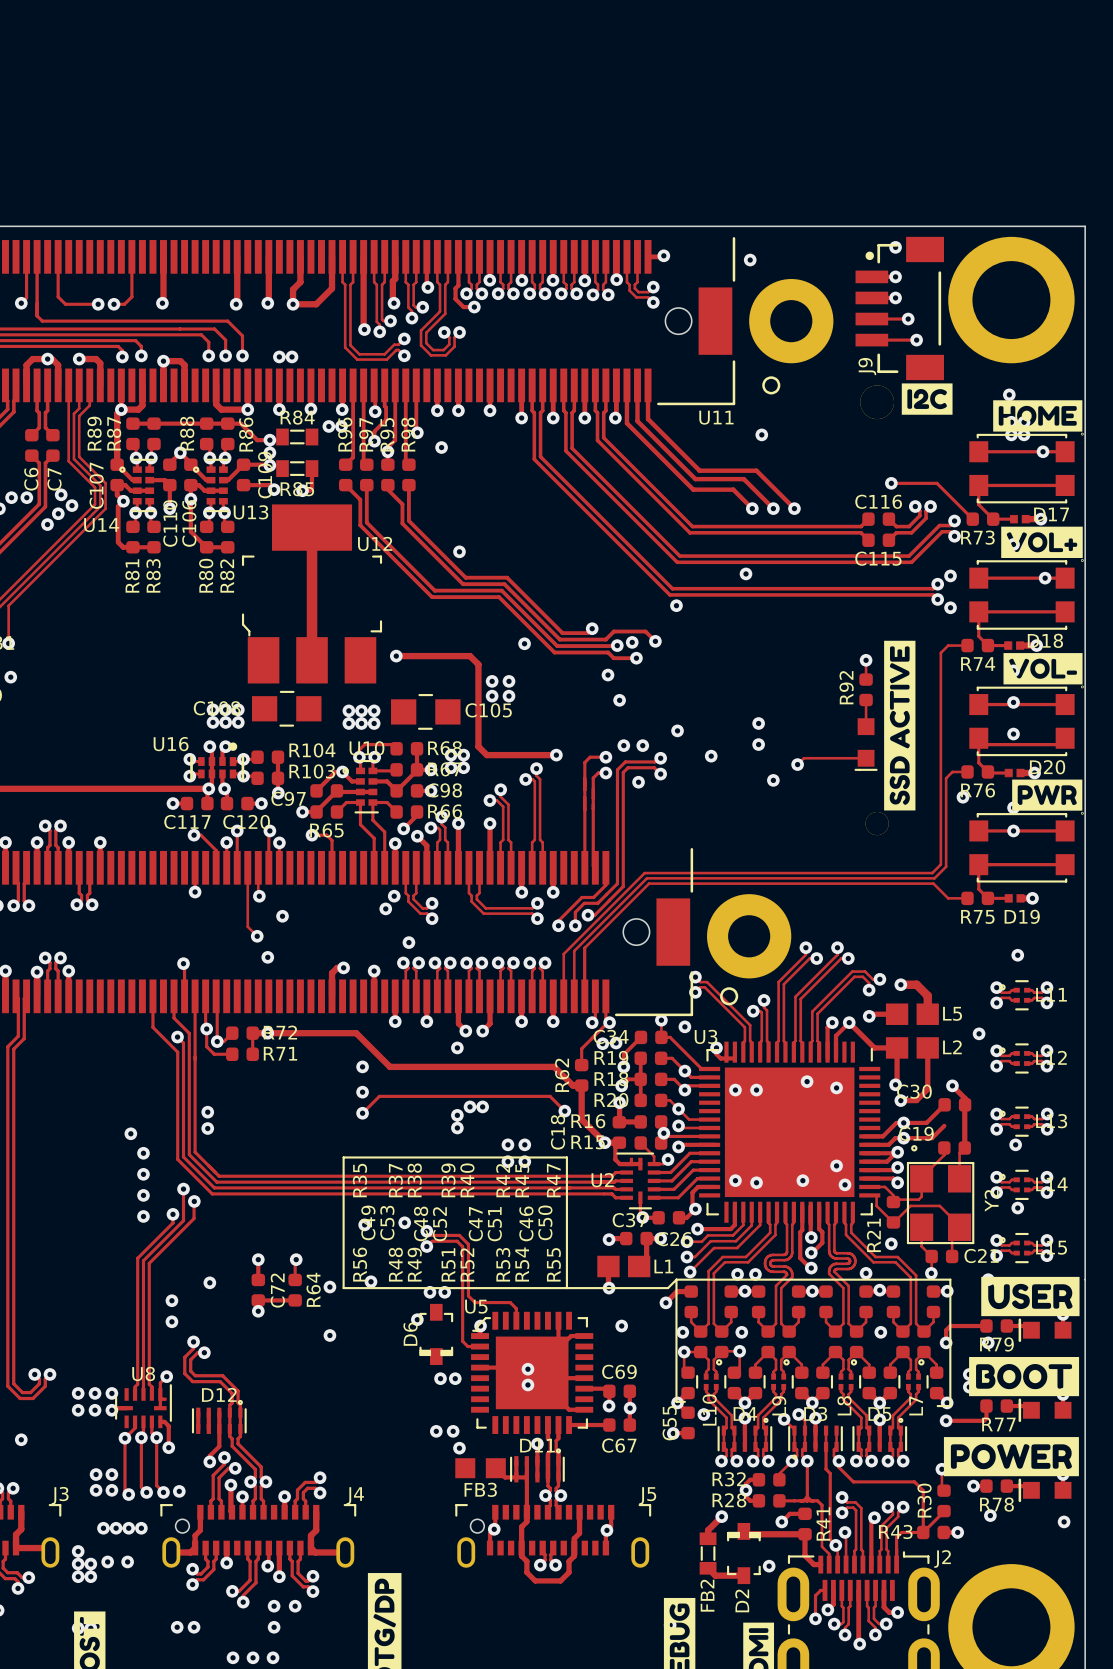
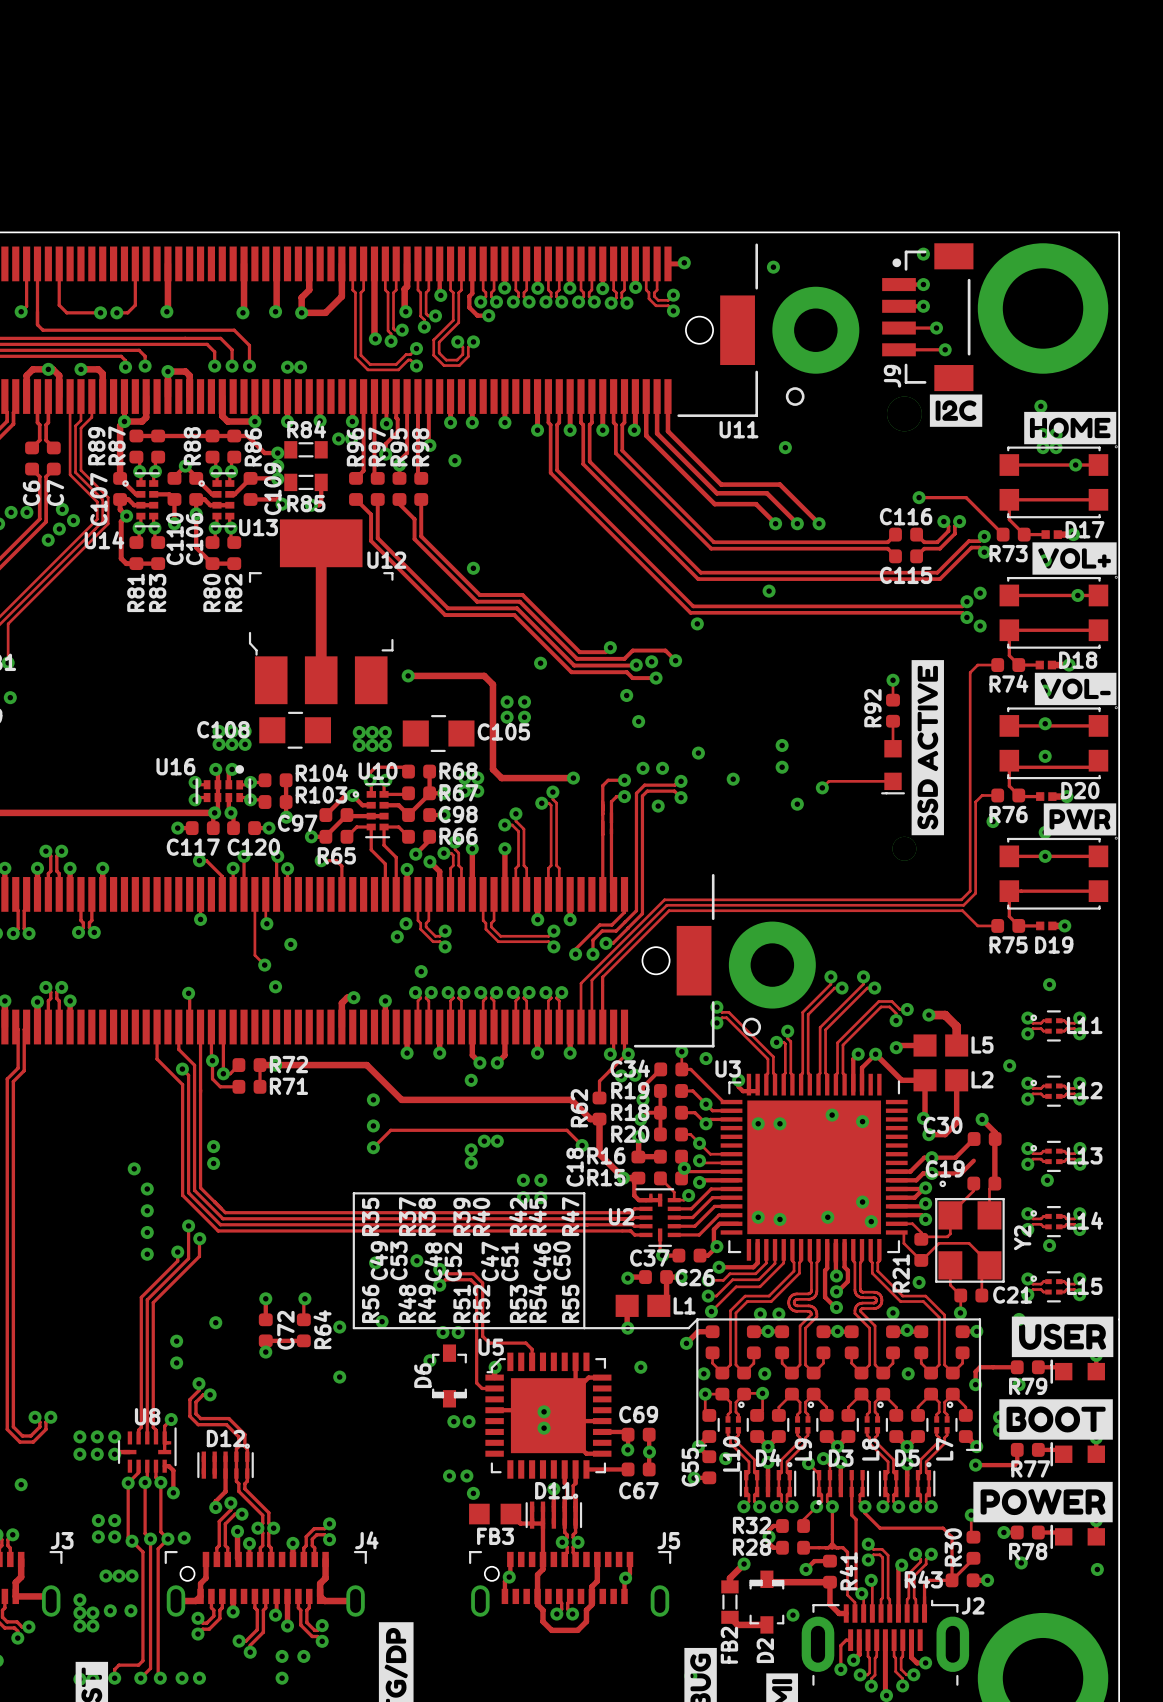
track: none -> (150, 1539) (150, 1668) (140, 1678)
track: none -> (167, 1539) (158, 1548) (158, 1676) (160, 1678)
track: none -> (132, 1541) (142, 1552) (142, 1660) (138, 1665) (119, 1665) (114, 1669) (114, 1678)
via: (141, 1528) -> none
via: none -> (114, 1678)
via: none -> (140, 1678)
via: none -> (160, 1678)

